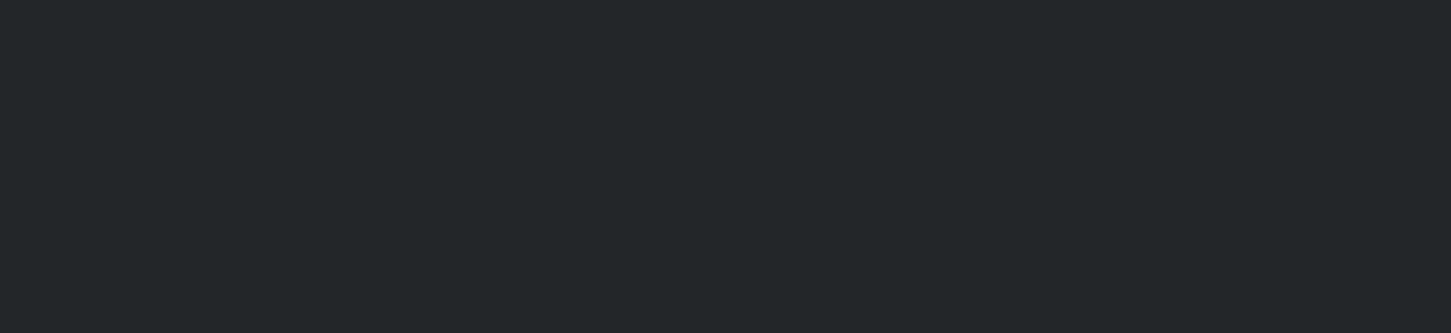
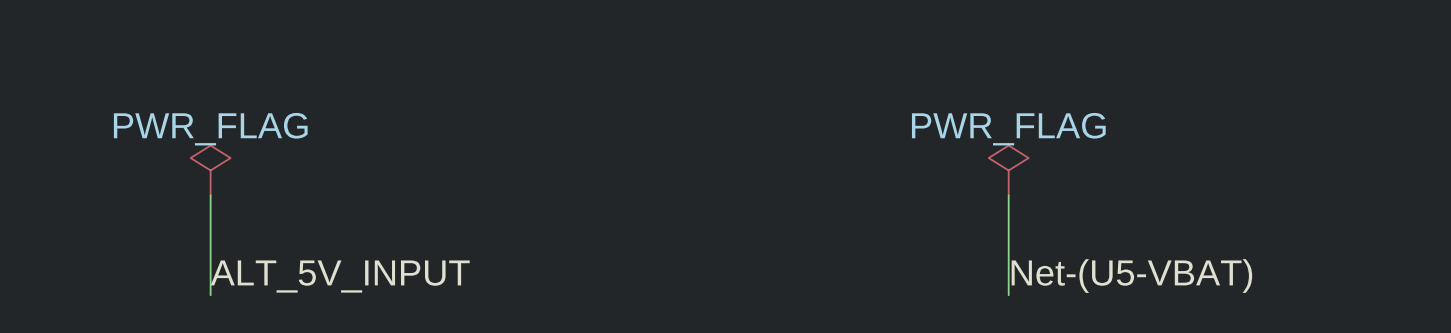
power symbol: none -> PWR_FLAG (210, 170)
power symbol: none -> PWR_FLAG (1008, 170)
wire: none -> (210, 195) (210, 295)
wire: none -> (1008, 195) (1008, 295)
label: none -> ALT_5V_INPUT (340, 276)
label: none -> Net-(U5-VBAT) (1131, 276)

